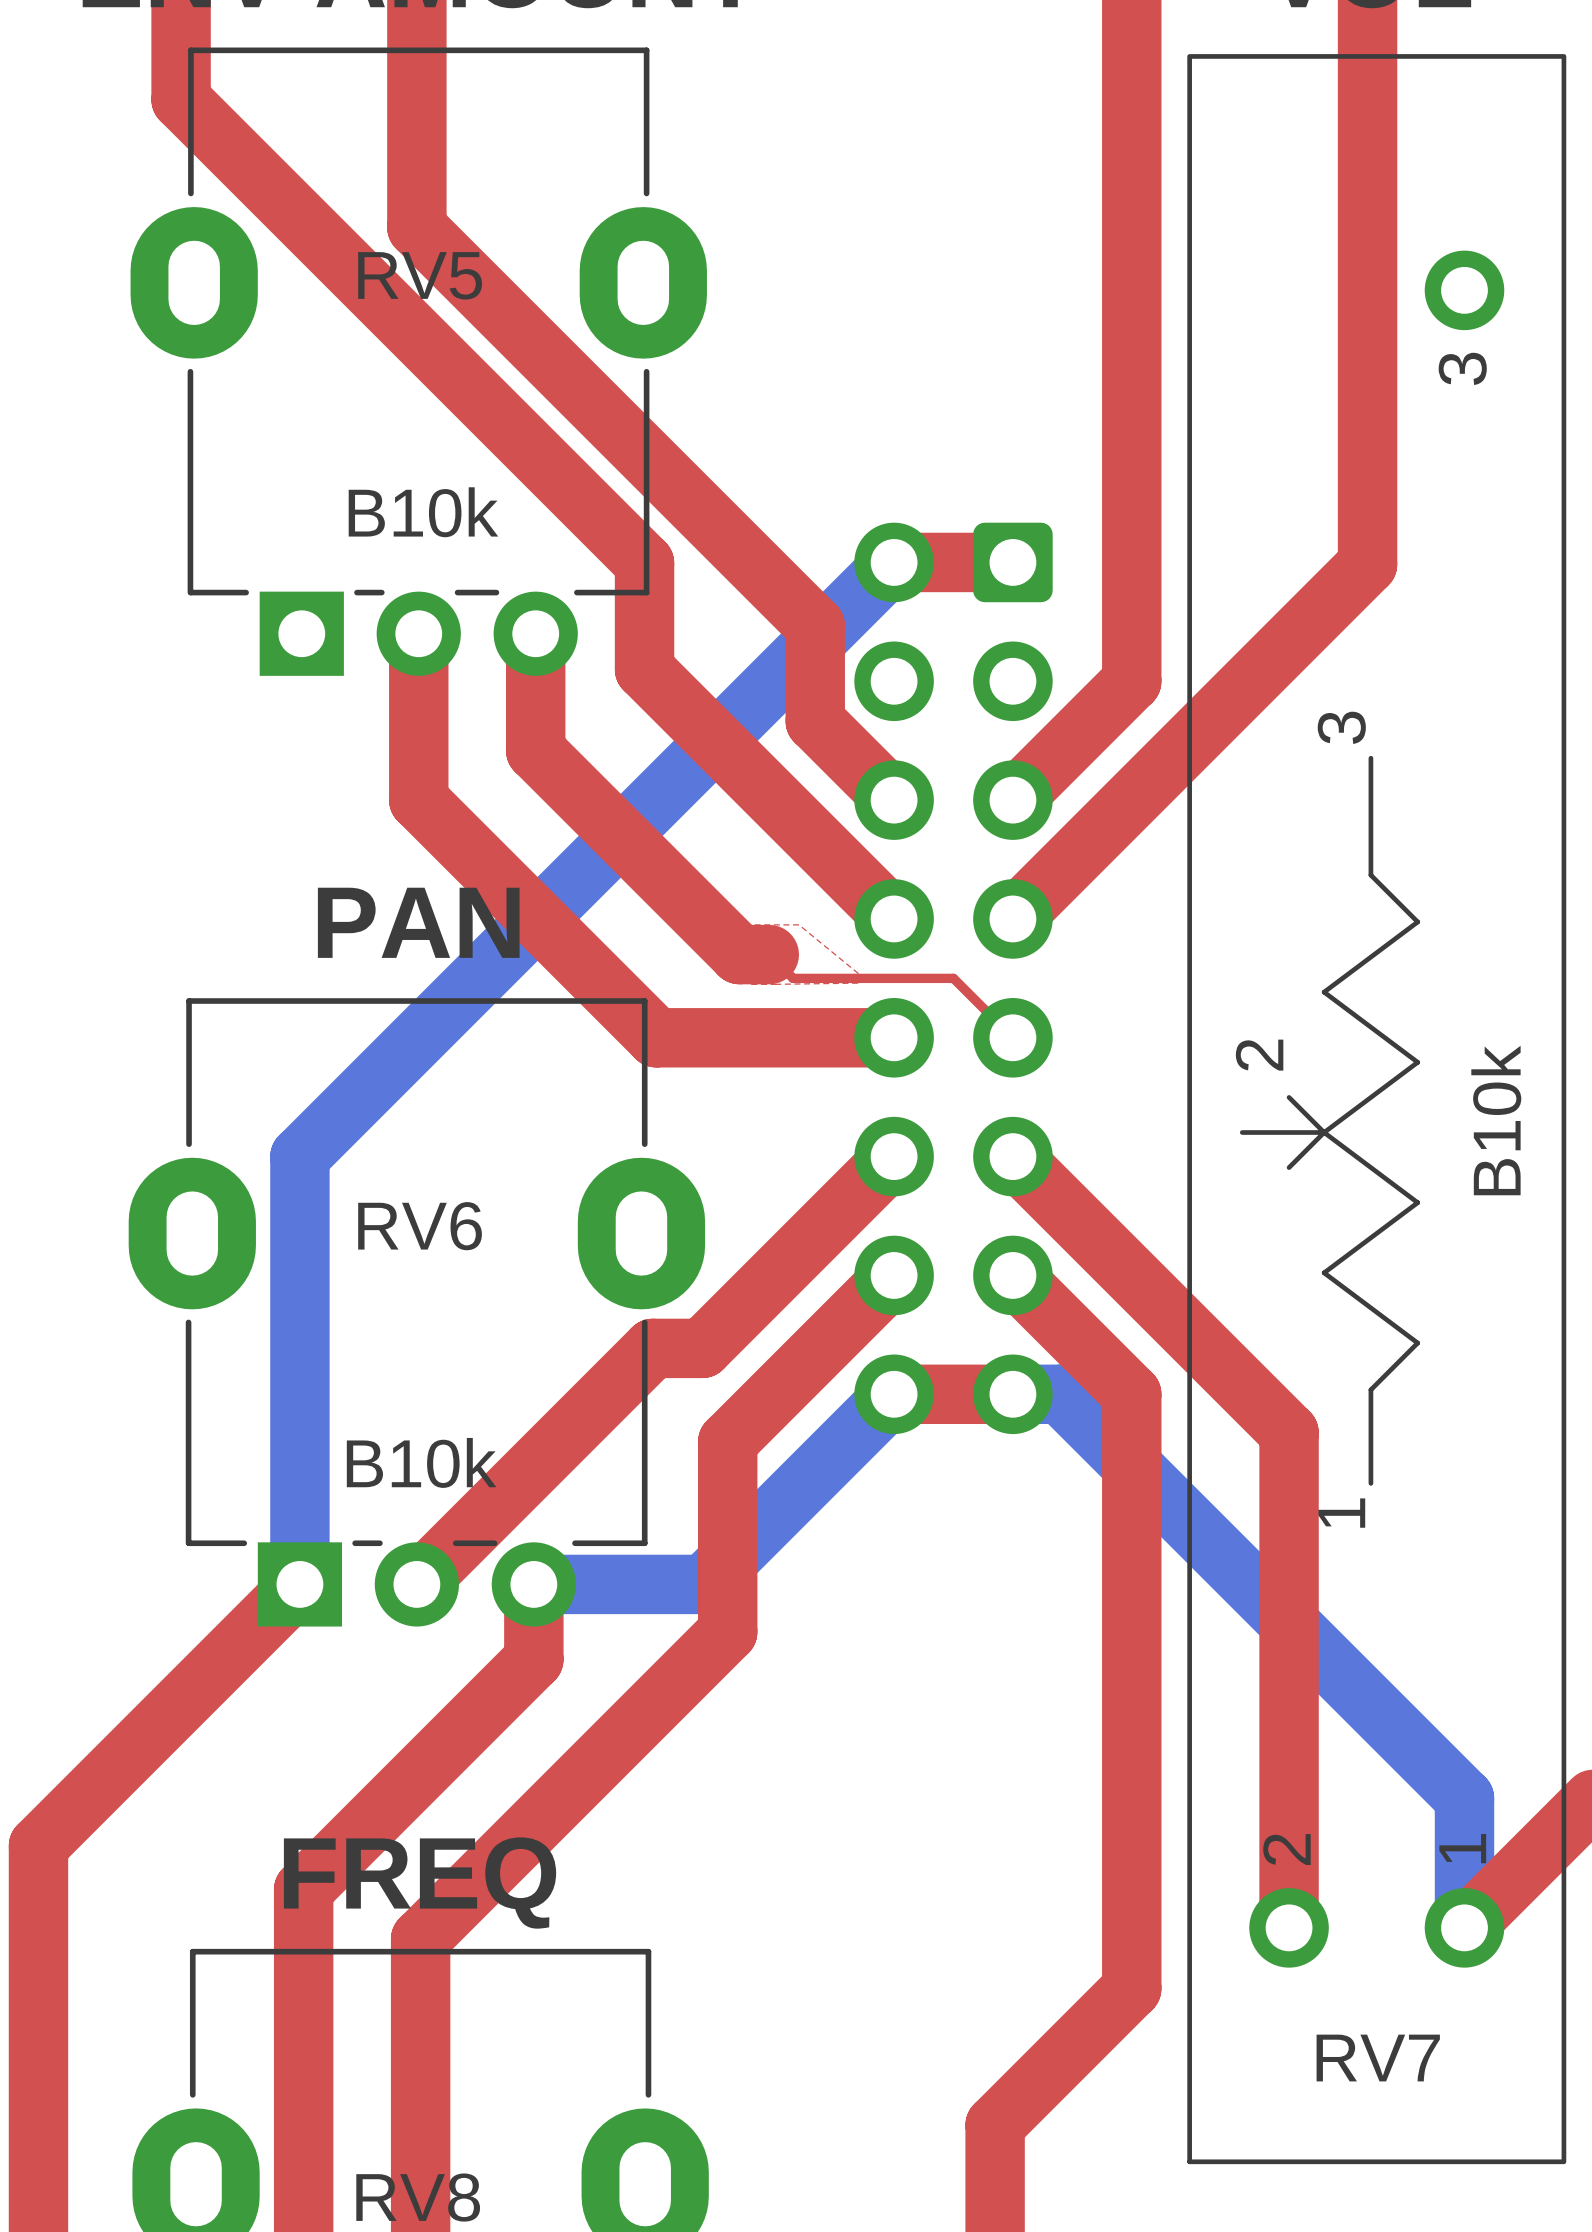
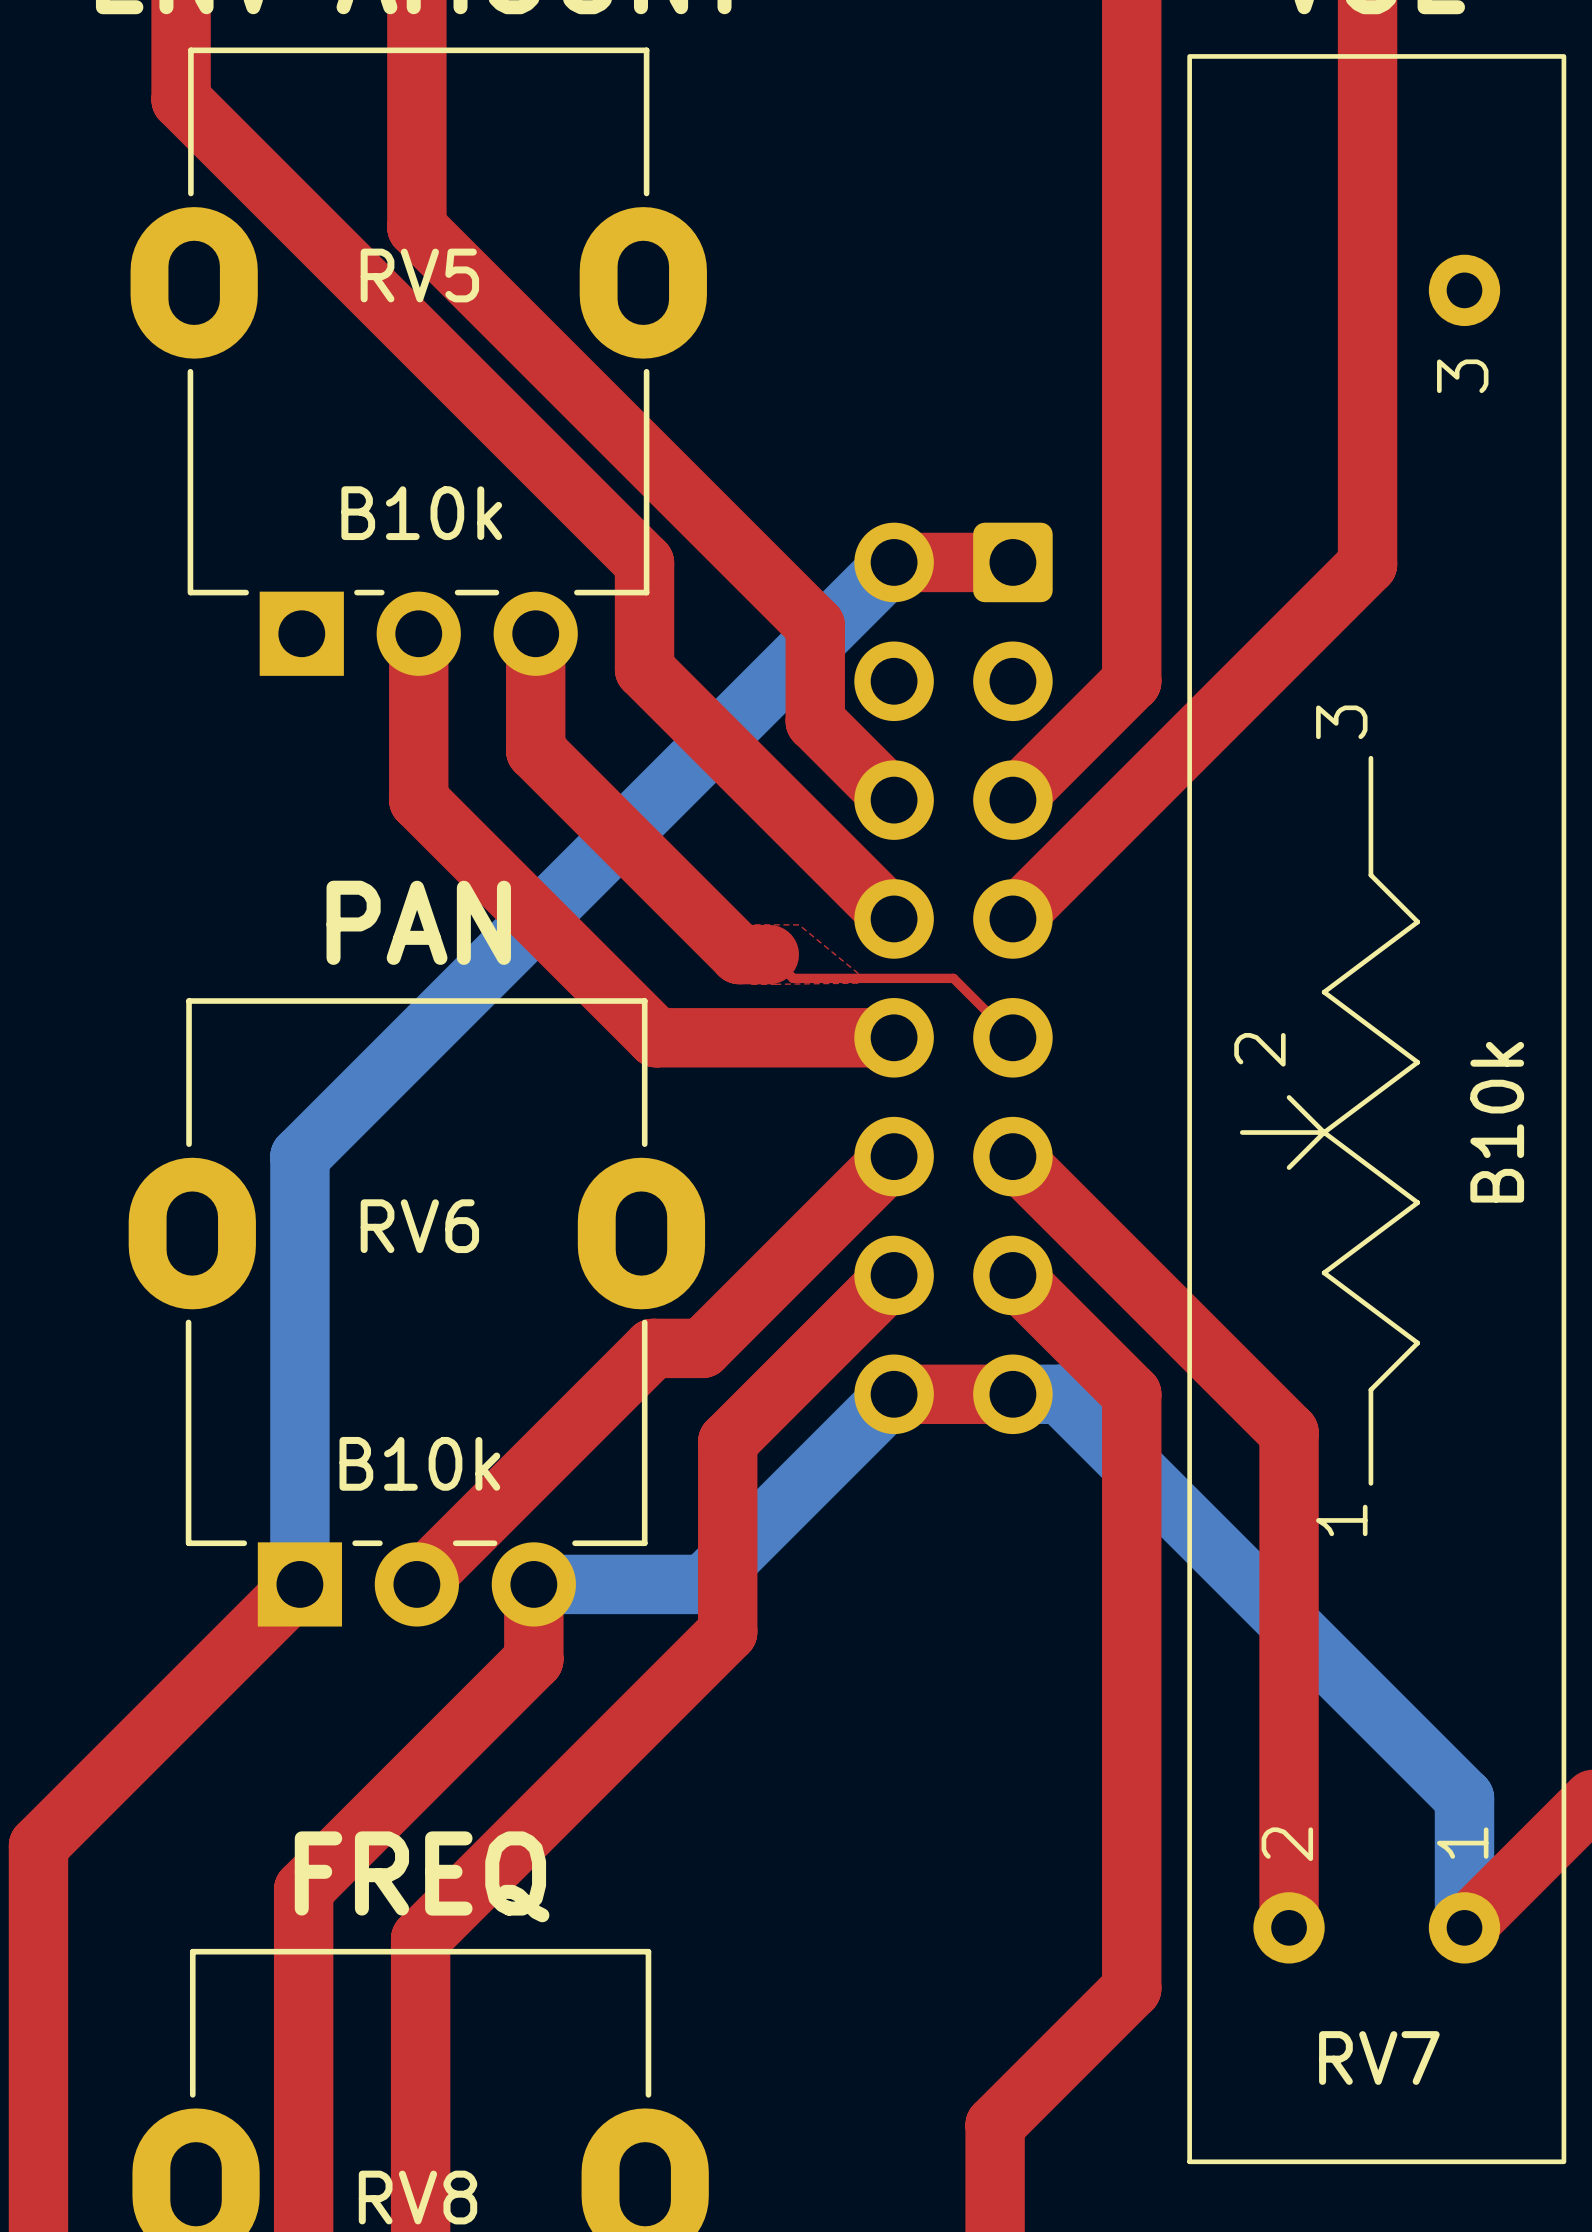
RV7 footprint: [1187, 54, 1567, 2165] -> [1187, 54, 1567, 2165]

